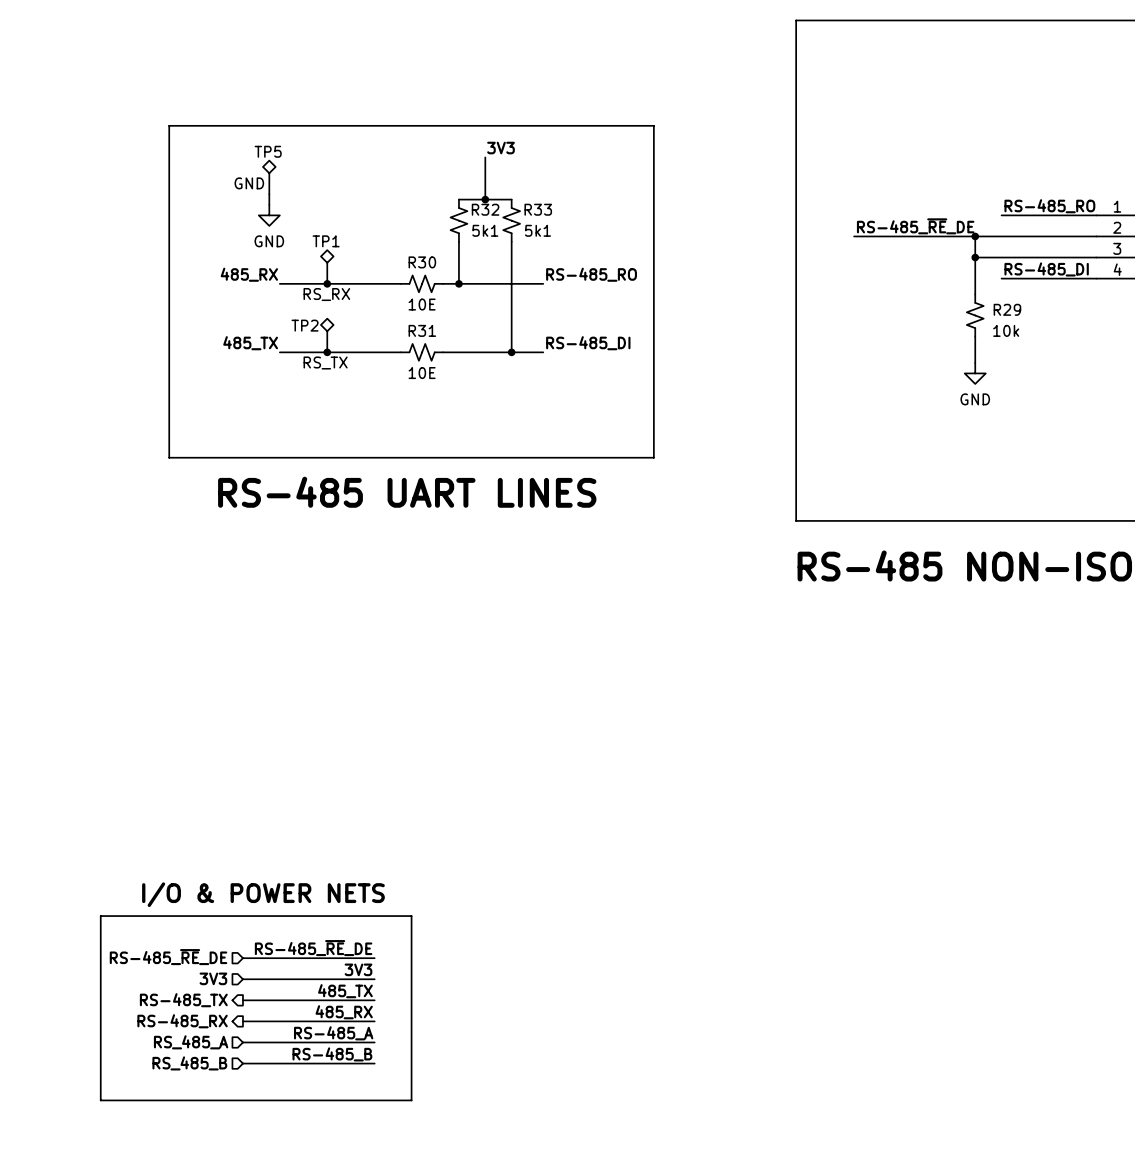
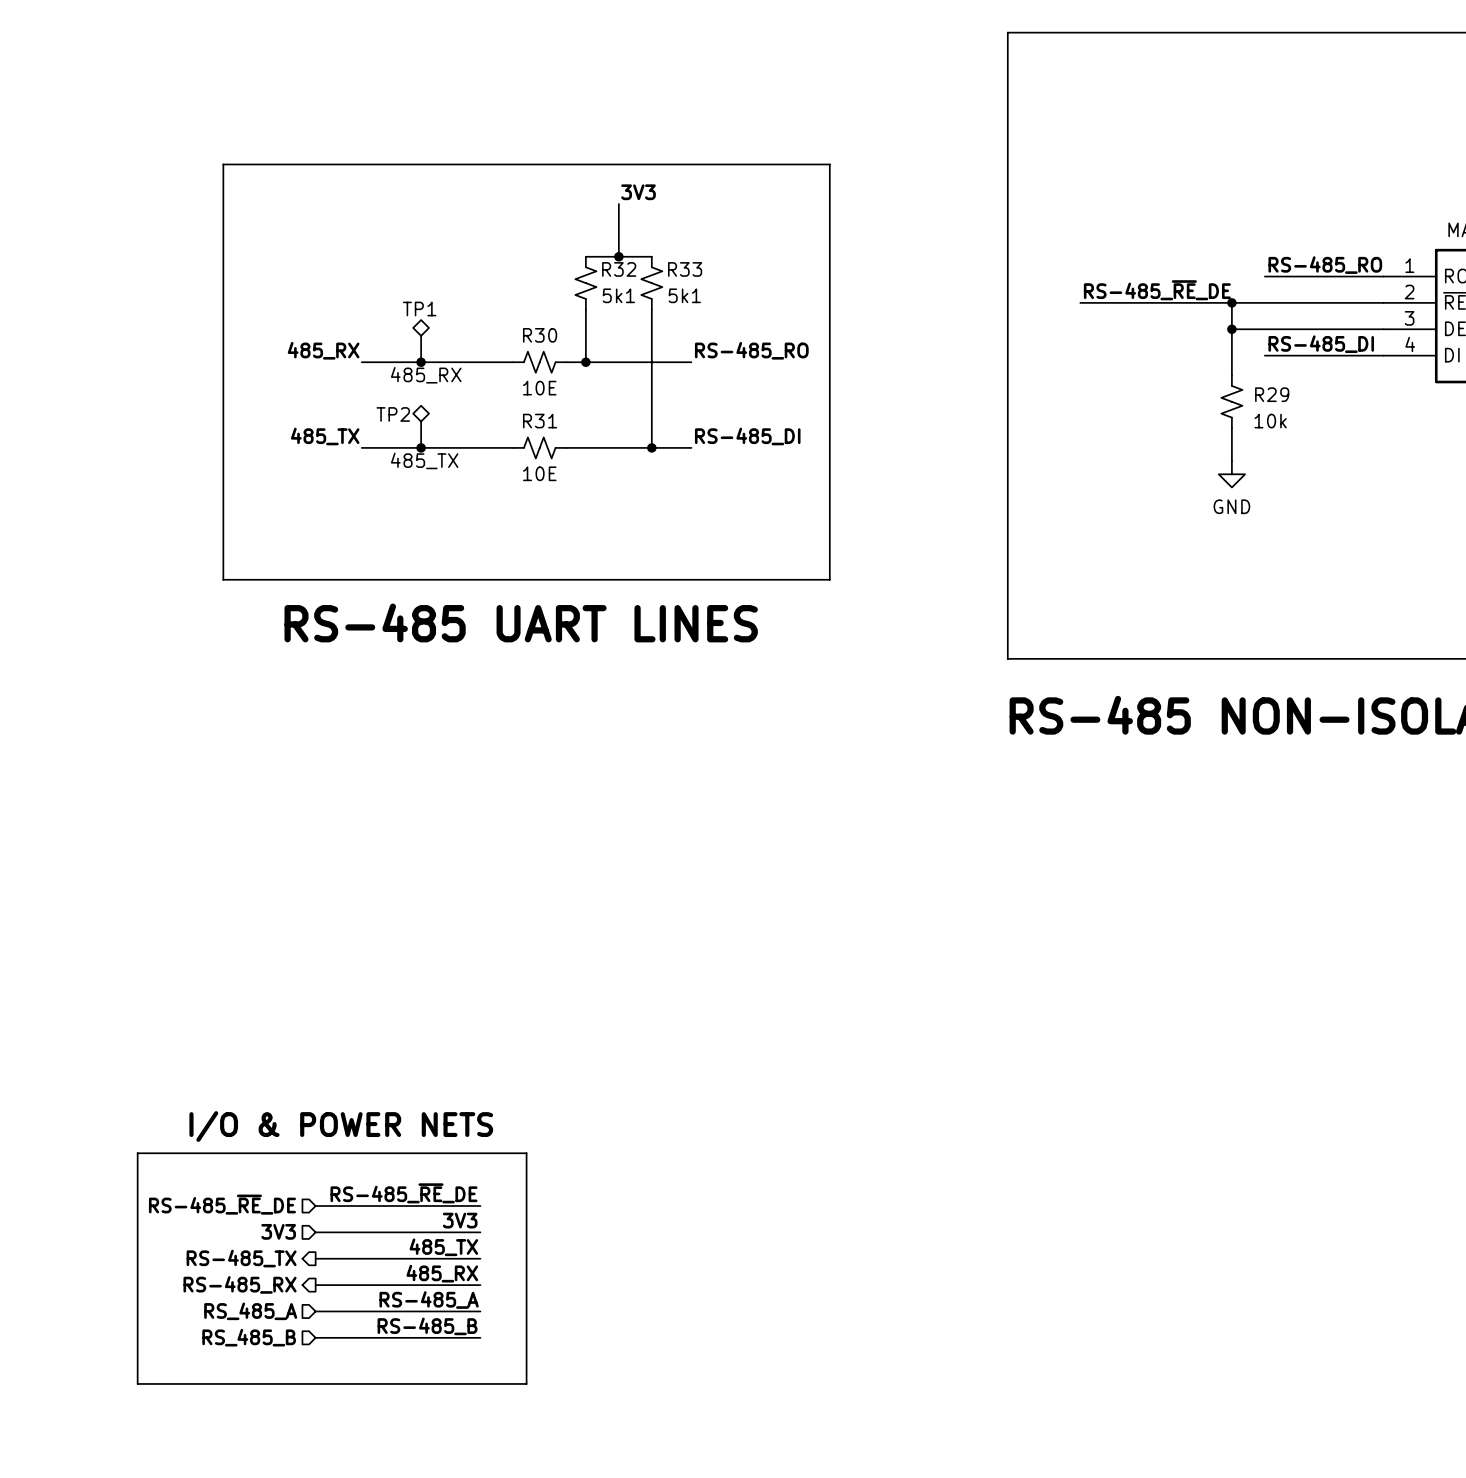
TP5: GND (269, 177) -> none
wire: (269, 194) (269, 204) -> none
power symbol: GND (269, 215) -> none
TP1 value: RS_RX (326, 294) -> 485_RX (426, 375)
TP2 value: RS_TX (325, 363) -> 485_TX (424, 460)

